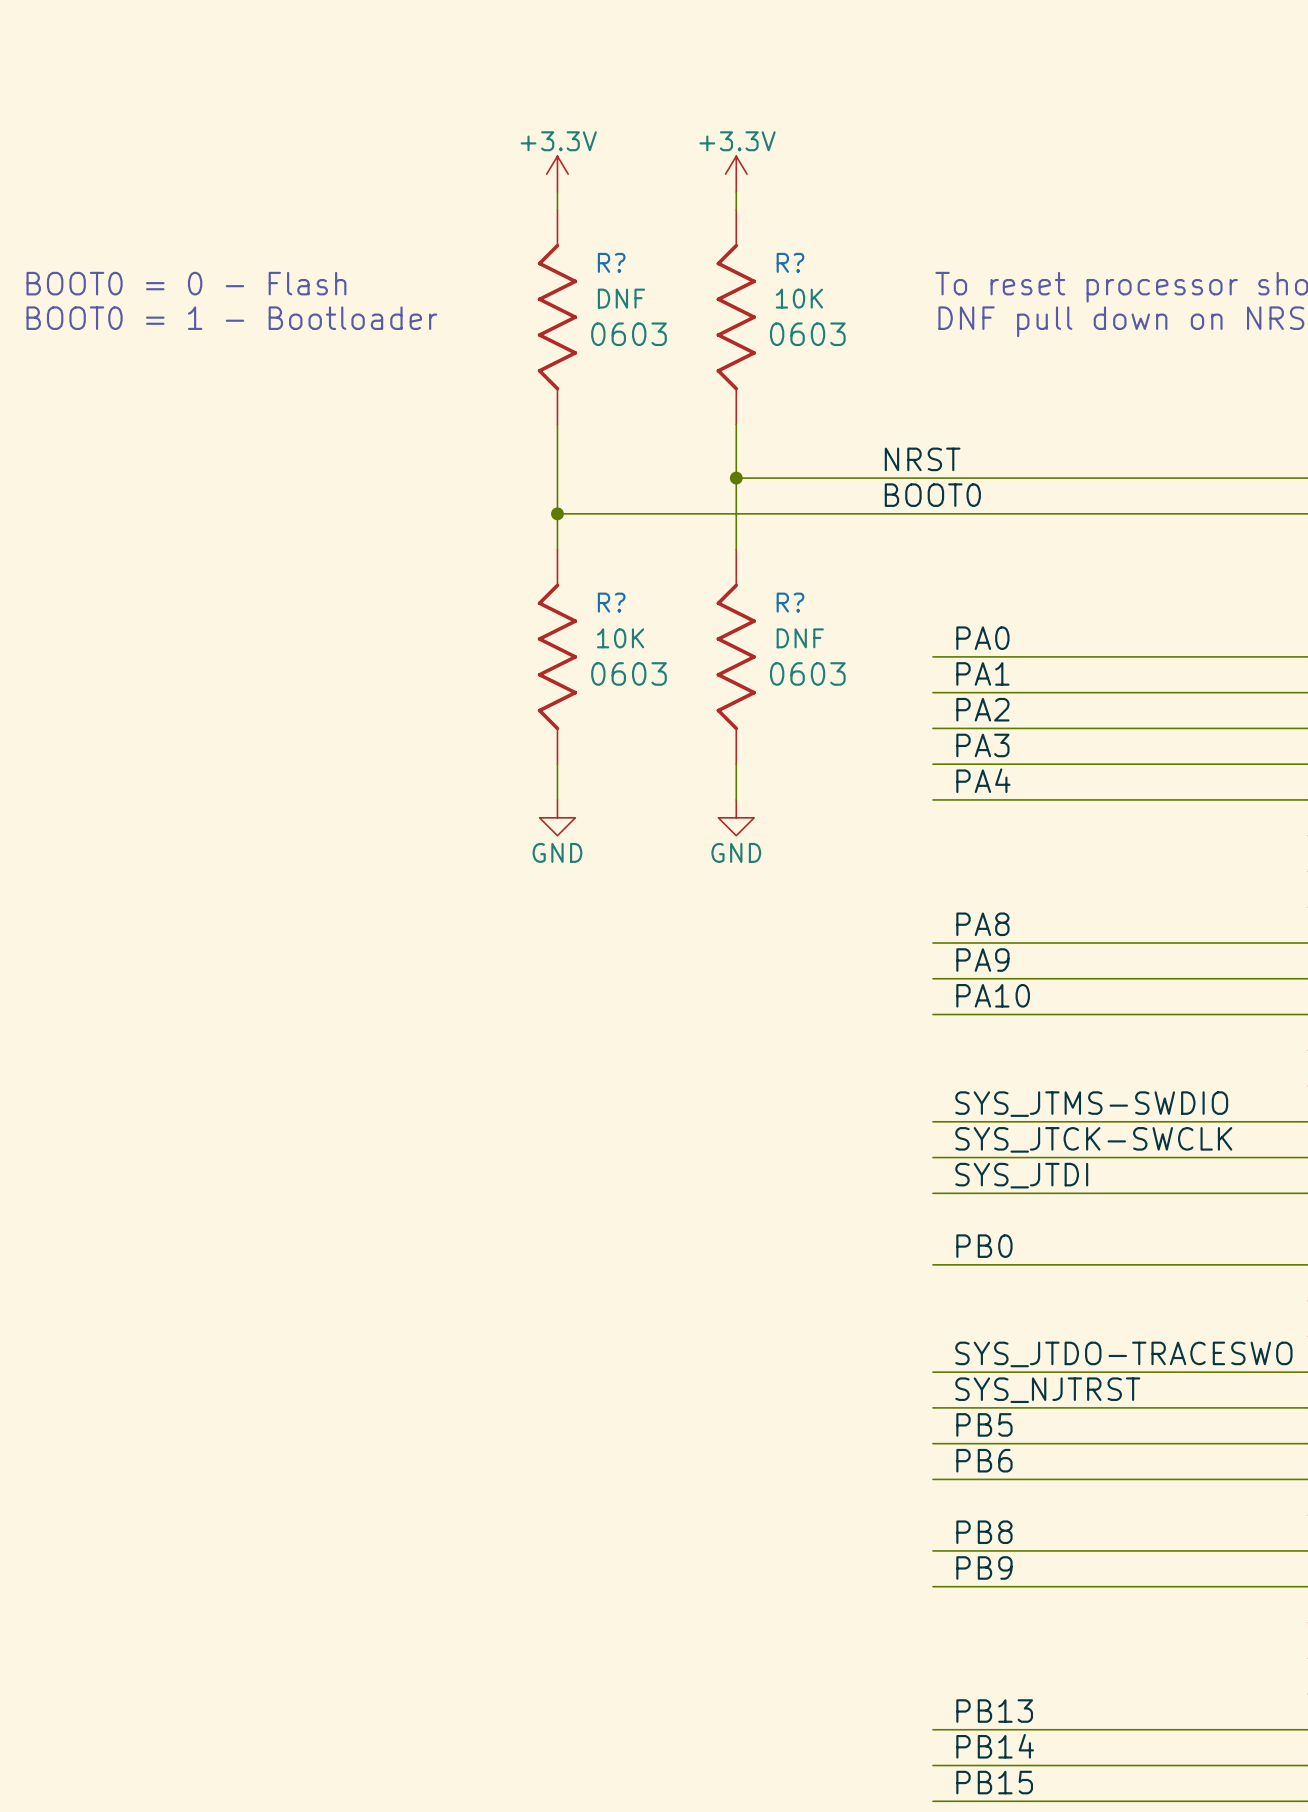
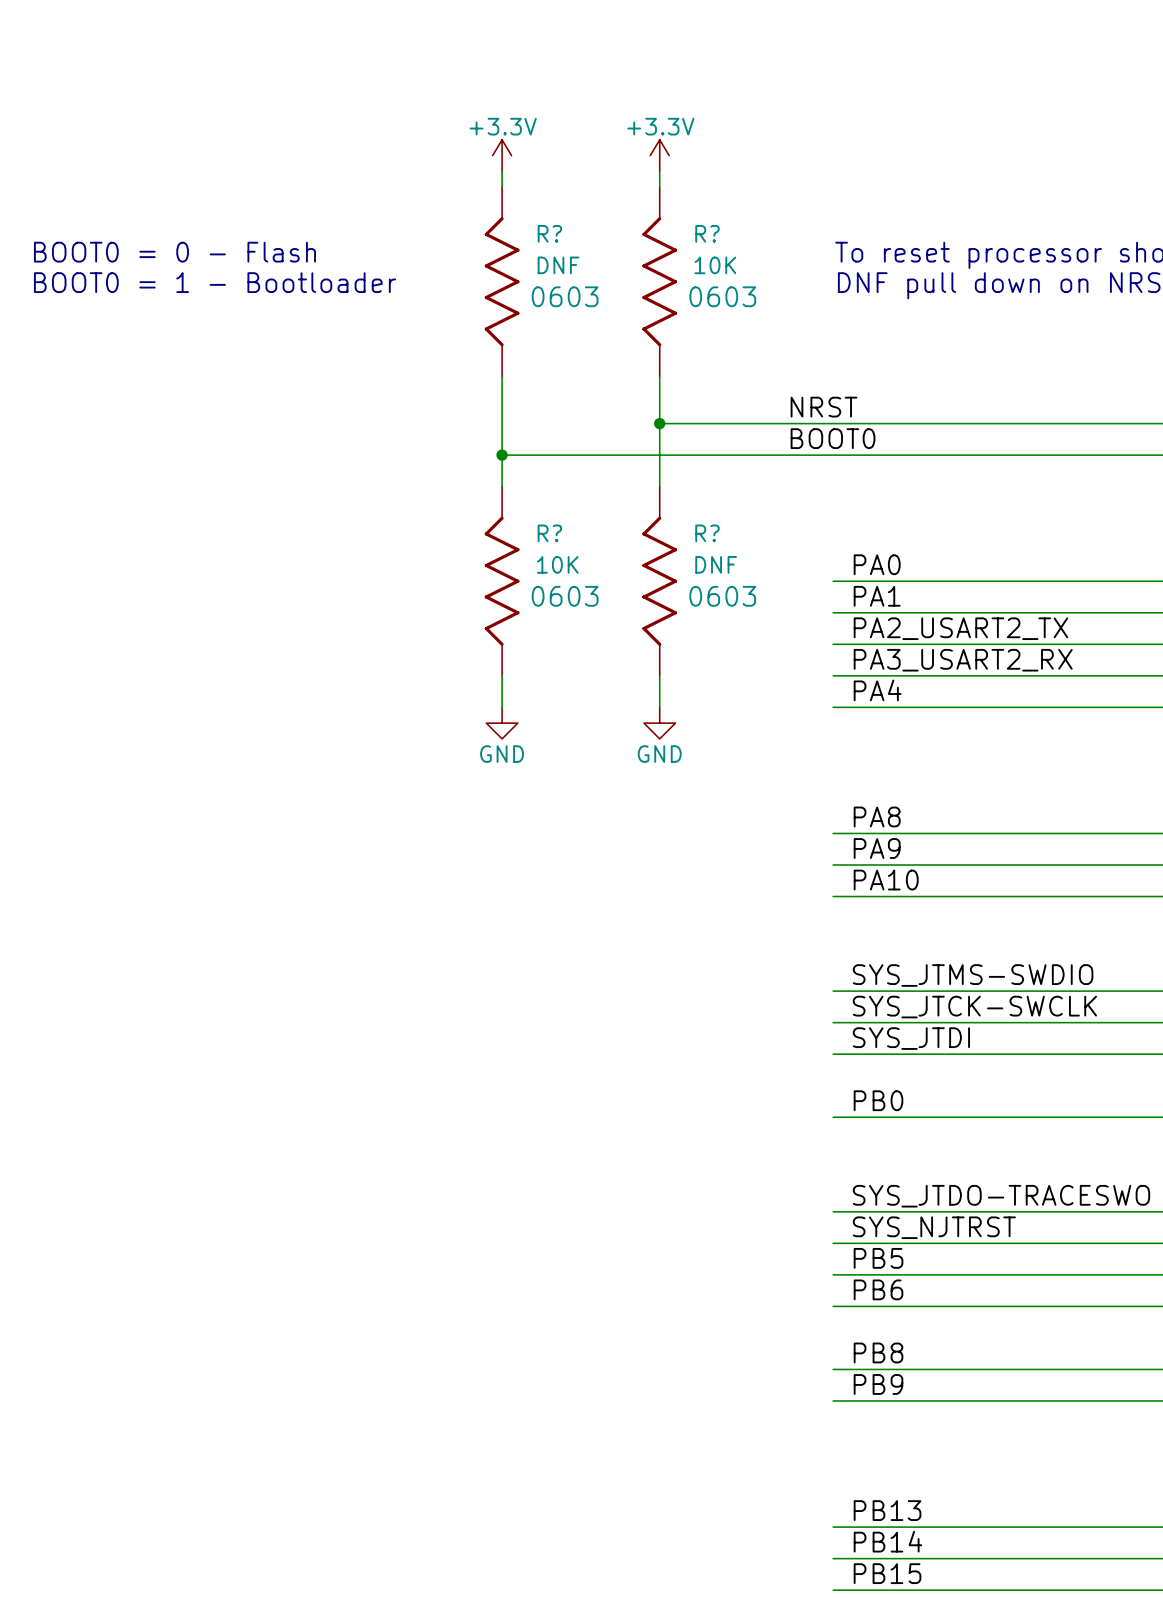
label: PA2 (982, 709) -> PA2_USART2_TX (960, 628)
label: PA3 (982, 745) -> PA3_USART2_RX (963, 660)

